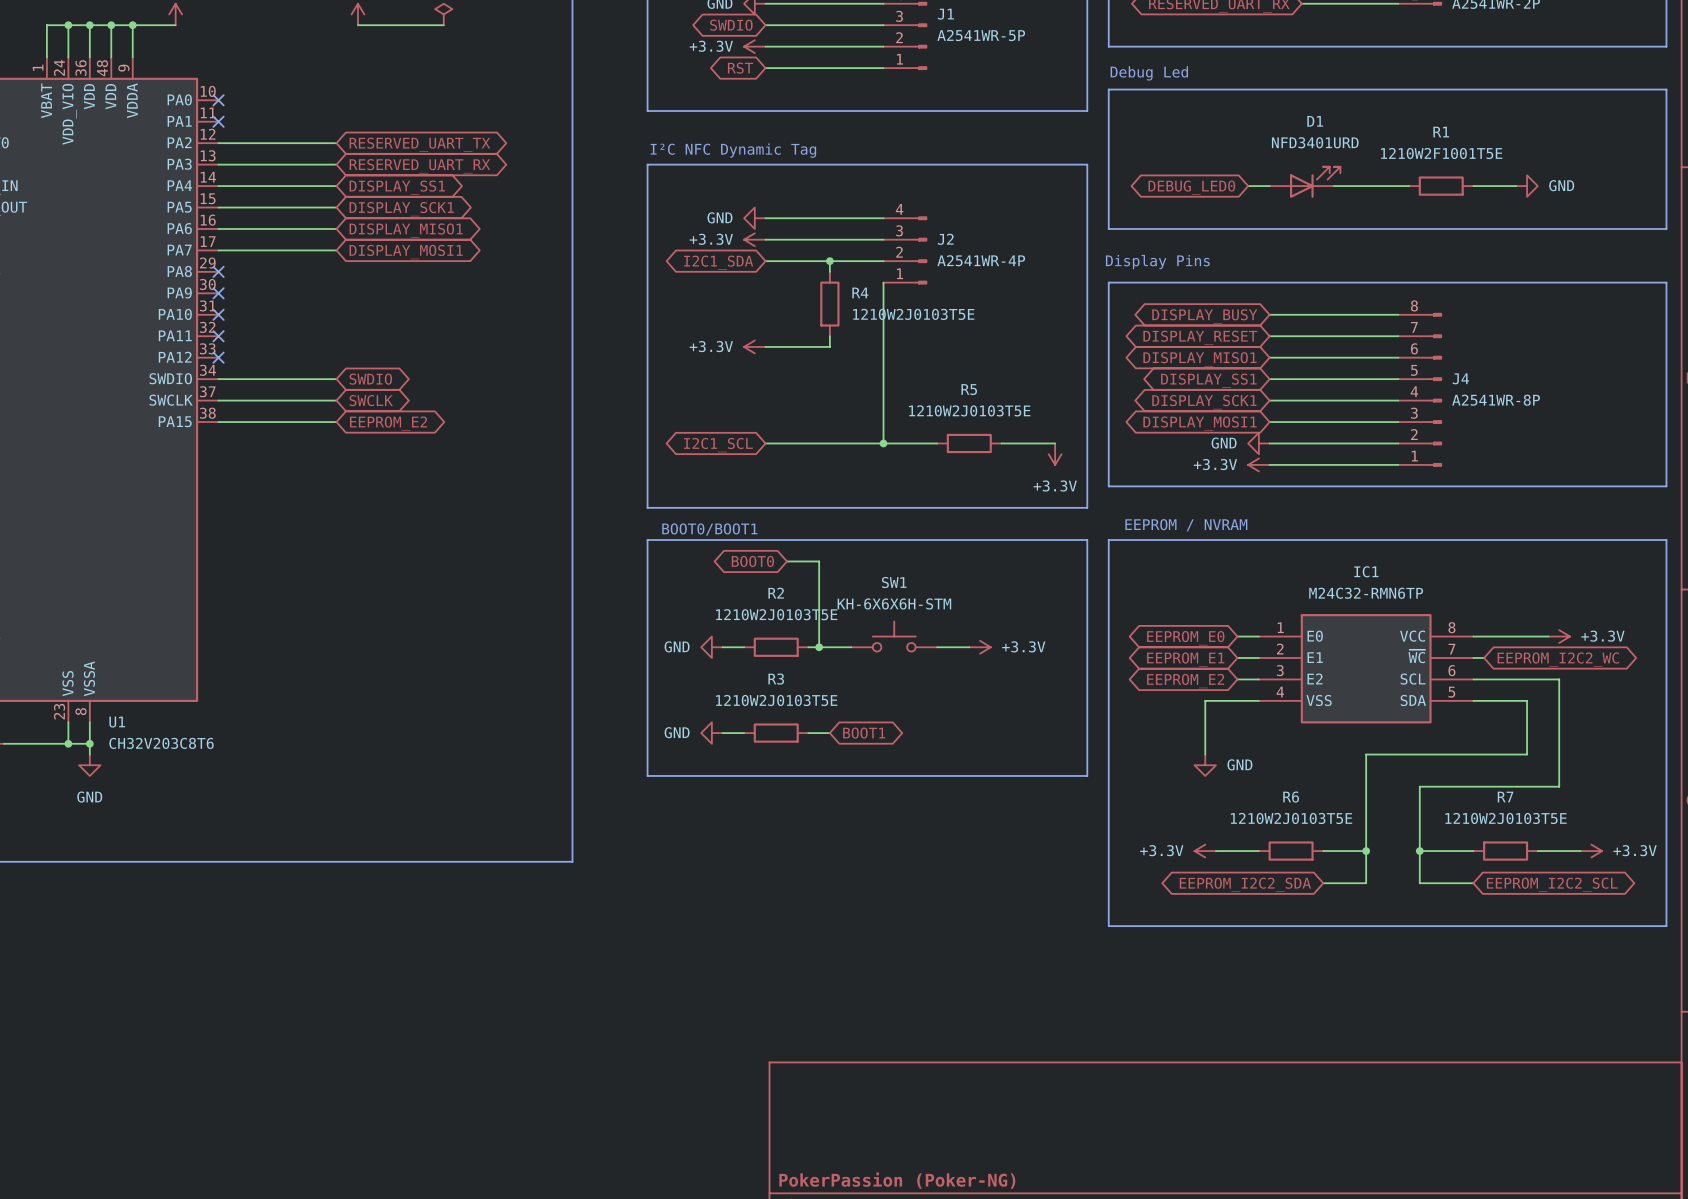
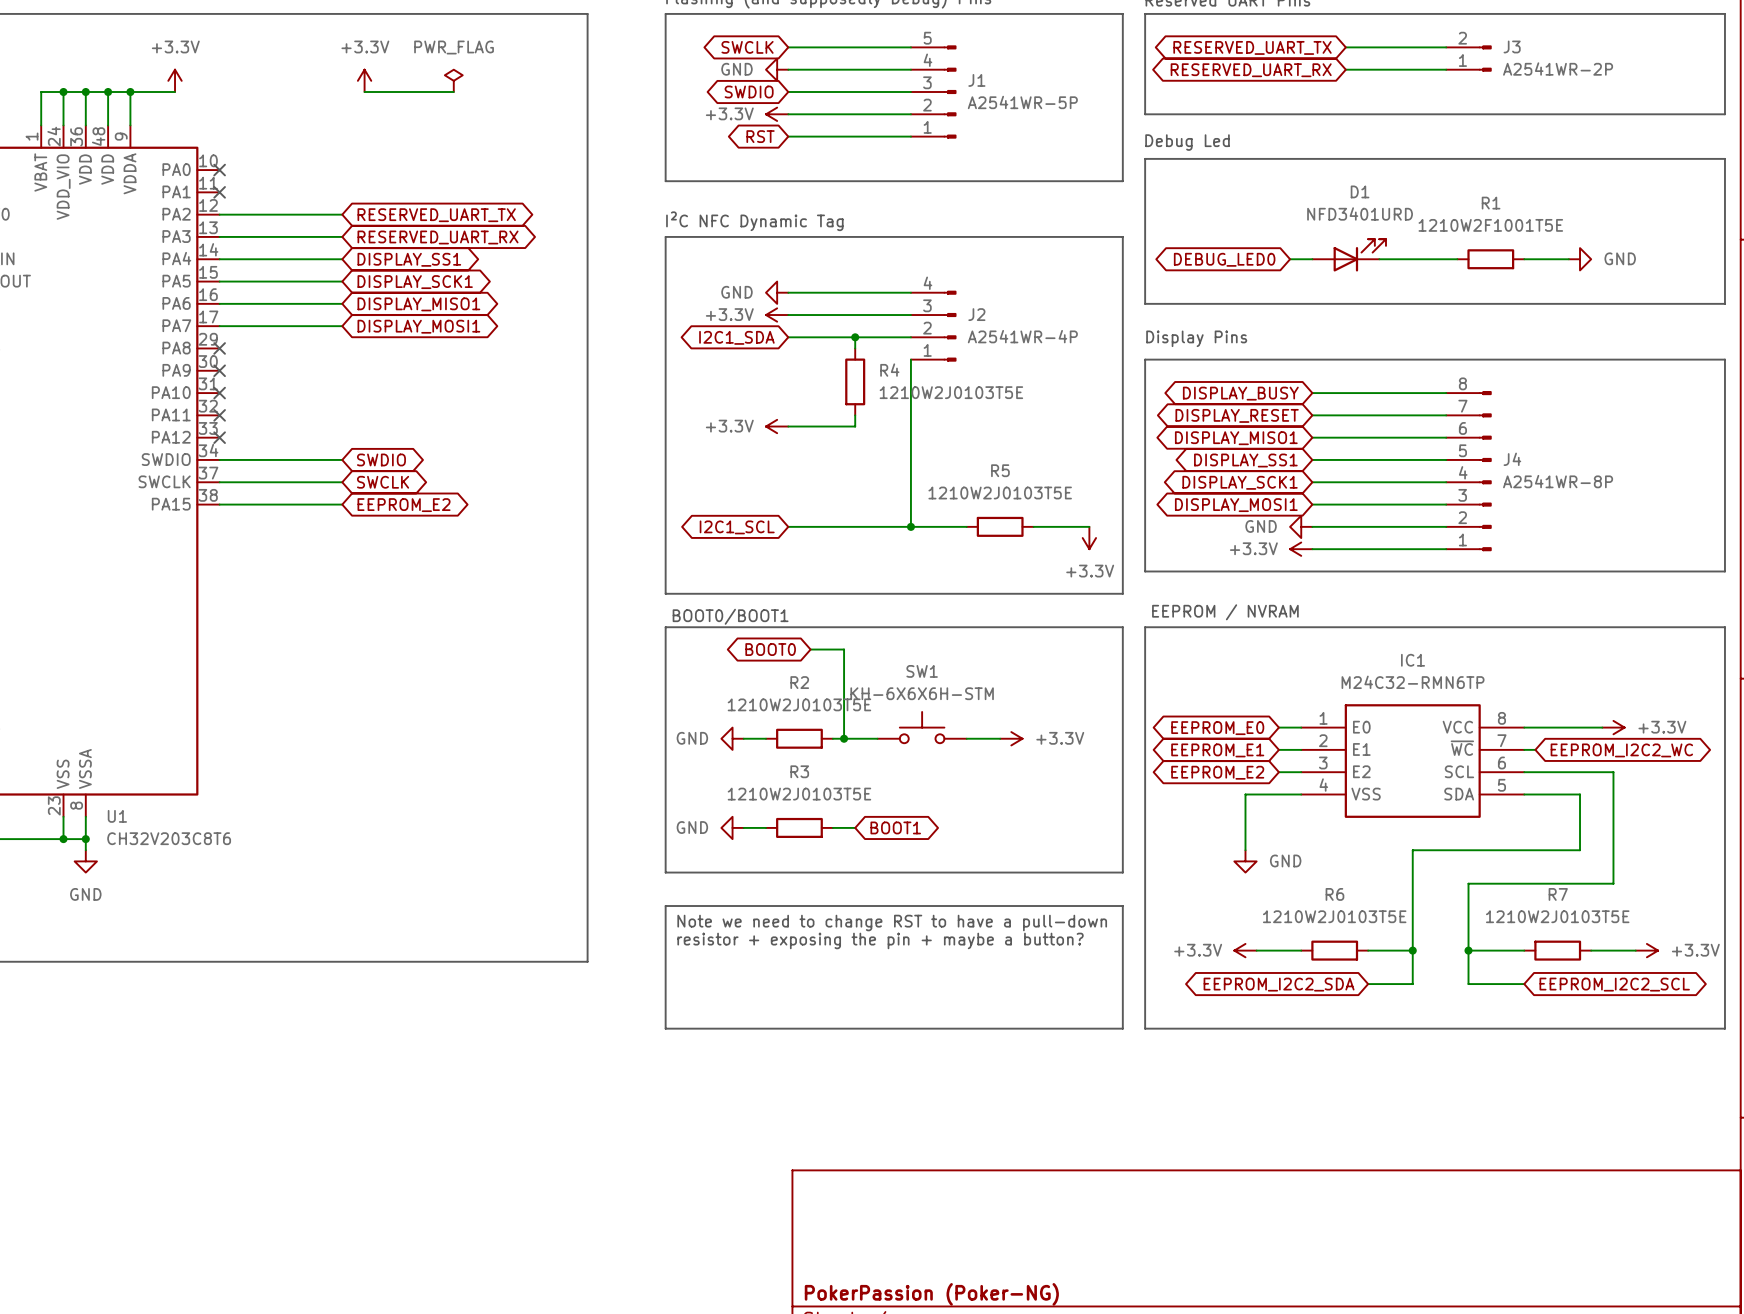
line: none -> (665, 906) (1122, 906) (1122, 1028) (665, 1028) (665, 906)
text: none -> Note we need to change RST to have a pull-down (892, 923)
text: none -> resistor + exposing the pin + maybe a button? (880, 940)

